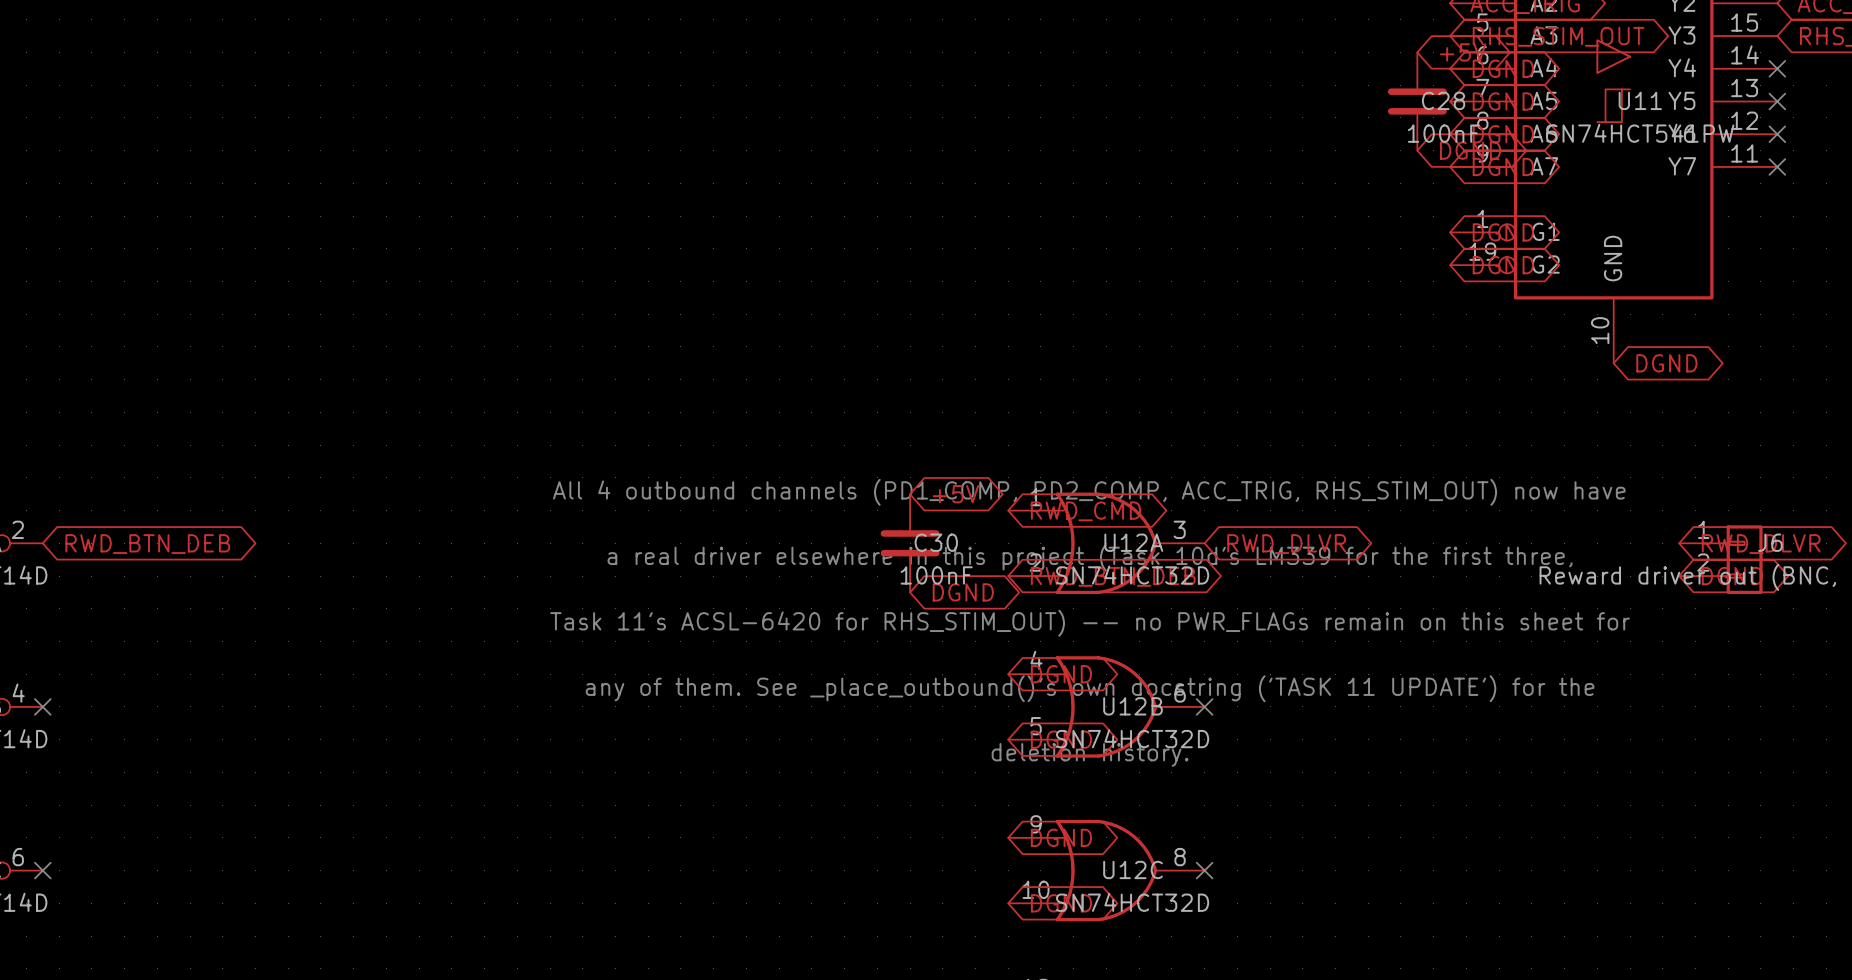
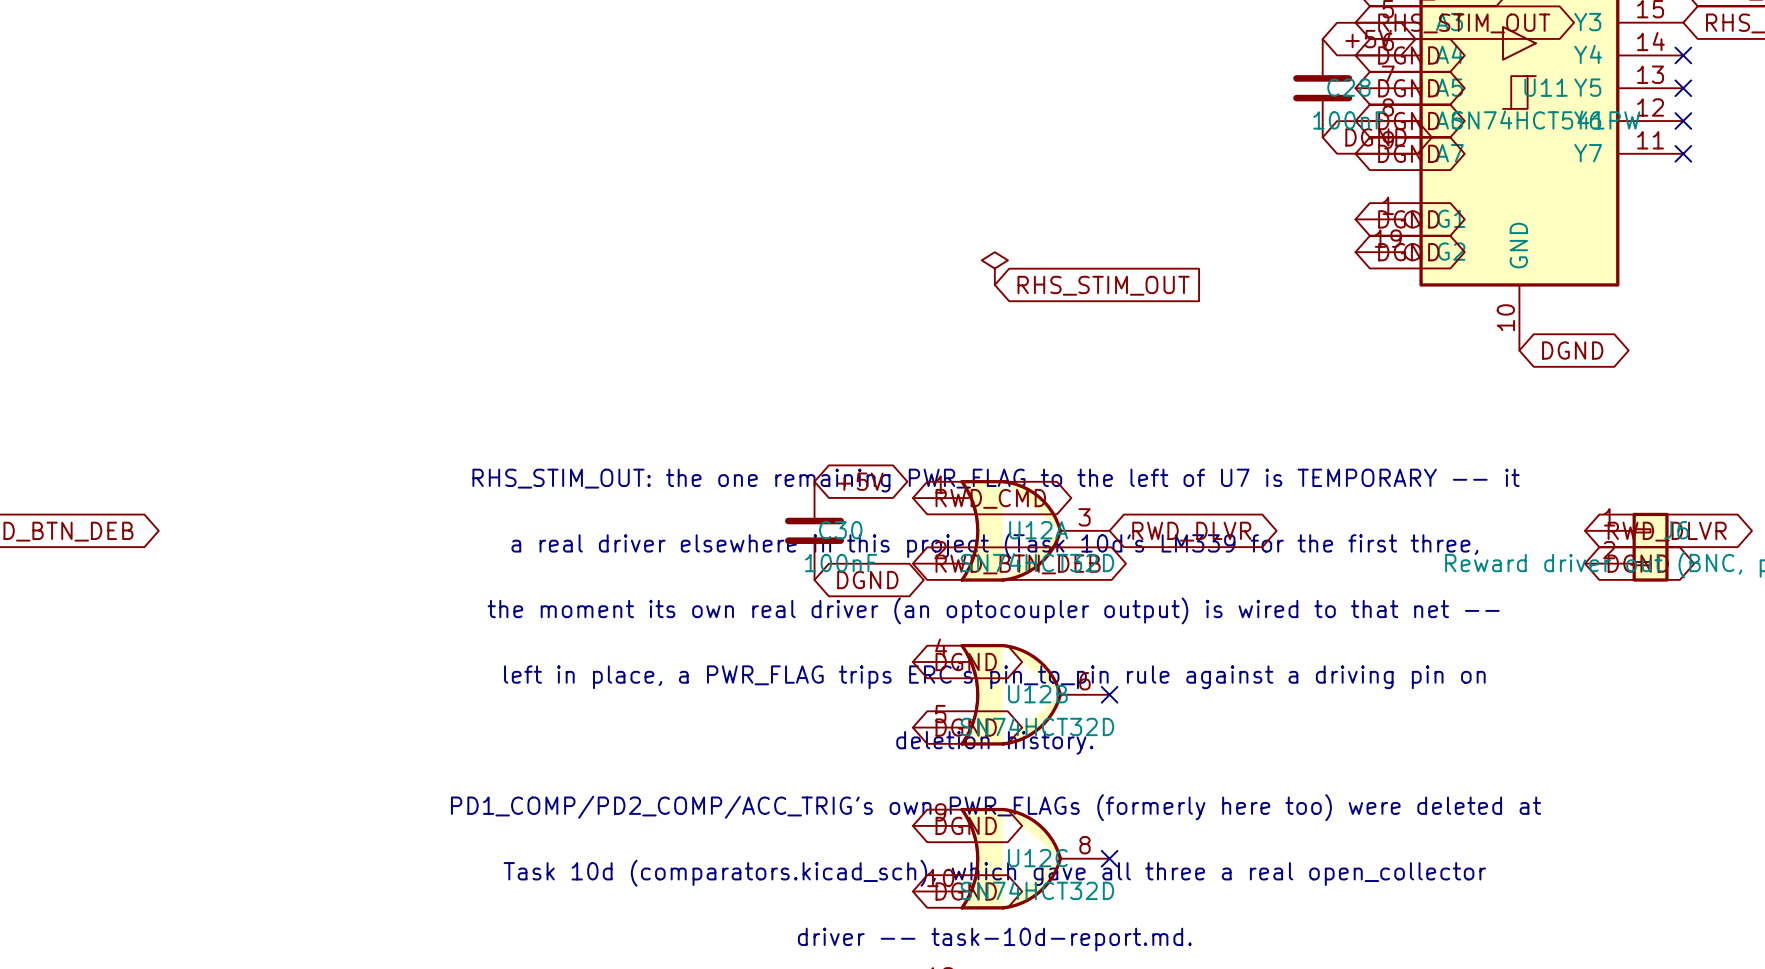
power symbol: none -> (994, 268)
global label: none -> RHS_STIM_OUT (1103, 285)
text: All 4 outbound channels (PD1_COMP, PD2_COMP, ACC_TRIG, RHS_STIM_OUT) now have (1089, 492) -> RHS_STIM_OUT: the one remaining PWR_FLAG to the left of U7 is TEMPORARY -- it (996, 480)
text: Task 11's ACSL-6420 for RHS_STIM_OUT) -- no PWR_FLAGs remain on this sheet for (1090, 623) -> the moment its own real driver (an optocoupler output) is wired to that net -- (993, 610)
text: any of them. See _place_outbound()'s own docstring ('TASK 11 UPDATE') for the (1090, 688) -> left in place, a PWR_FLAG trips ERC's pin_to_pin rule against a driving pin on (994, 677)
text: none -> PD1_COMP/PD2_COMP/ACC_TRIG's own PWR_FLAGs (formerly here too) were deleted at (996, 807)
text: none -> Task 10d (comparators.kicad_sch), which gave all three a real open_collector (994, 873)
text: none -> driver -- task-10d-report.md. (994, 939)

